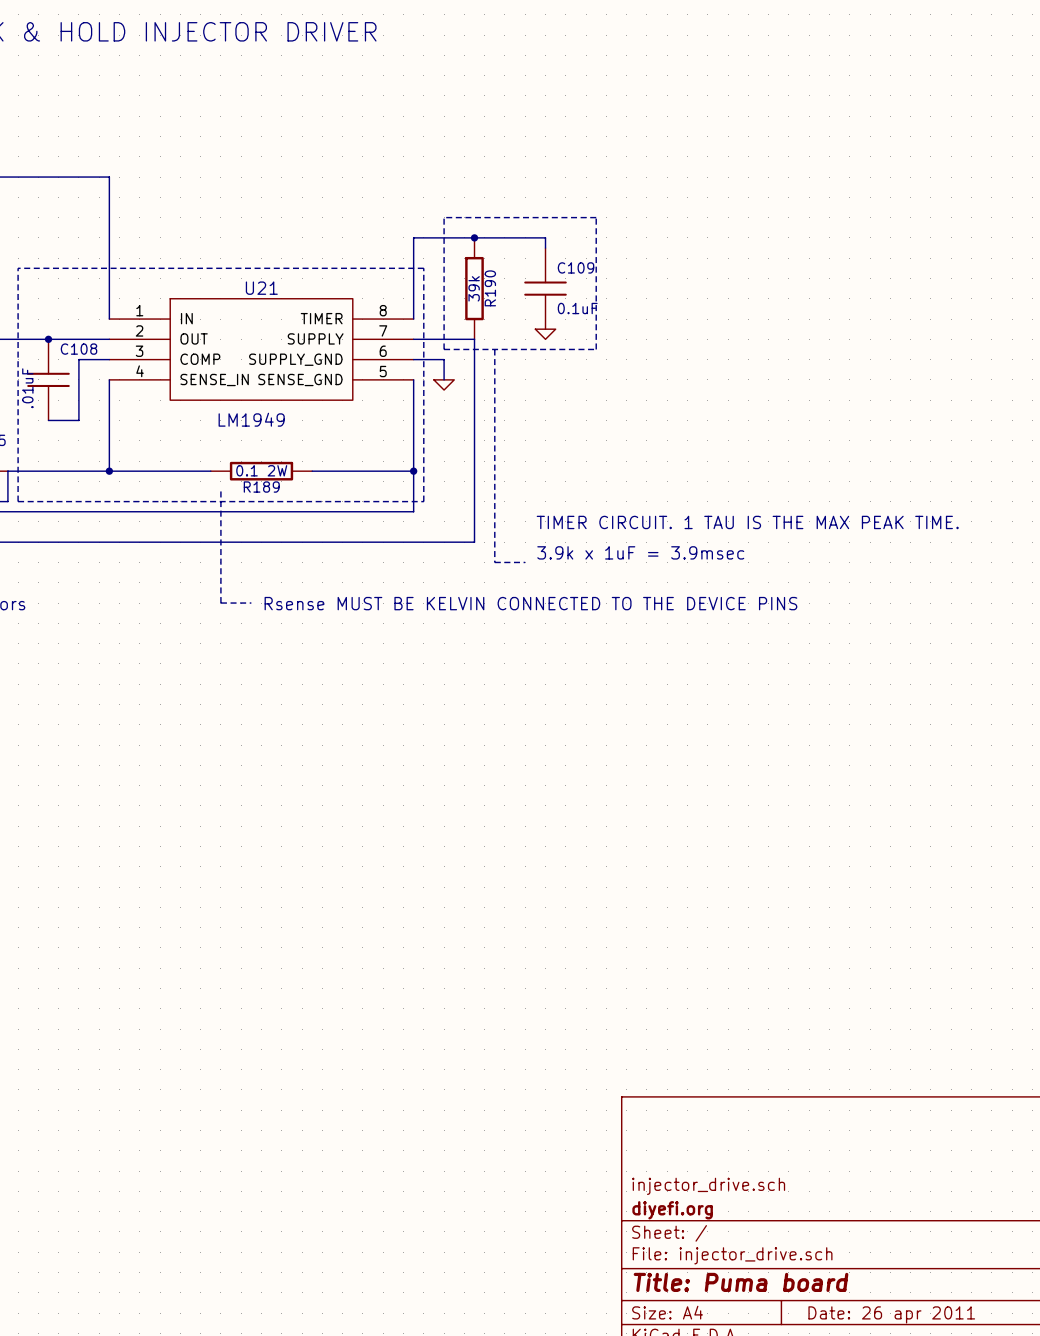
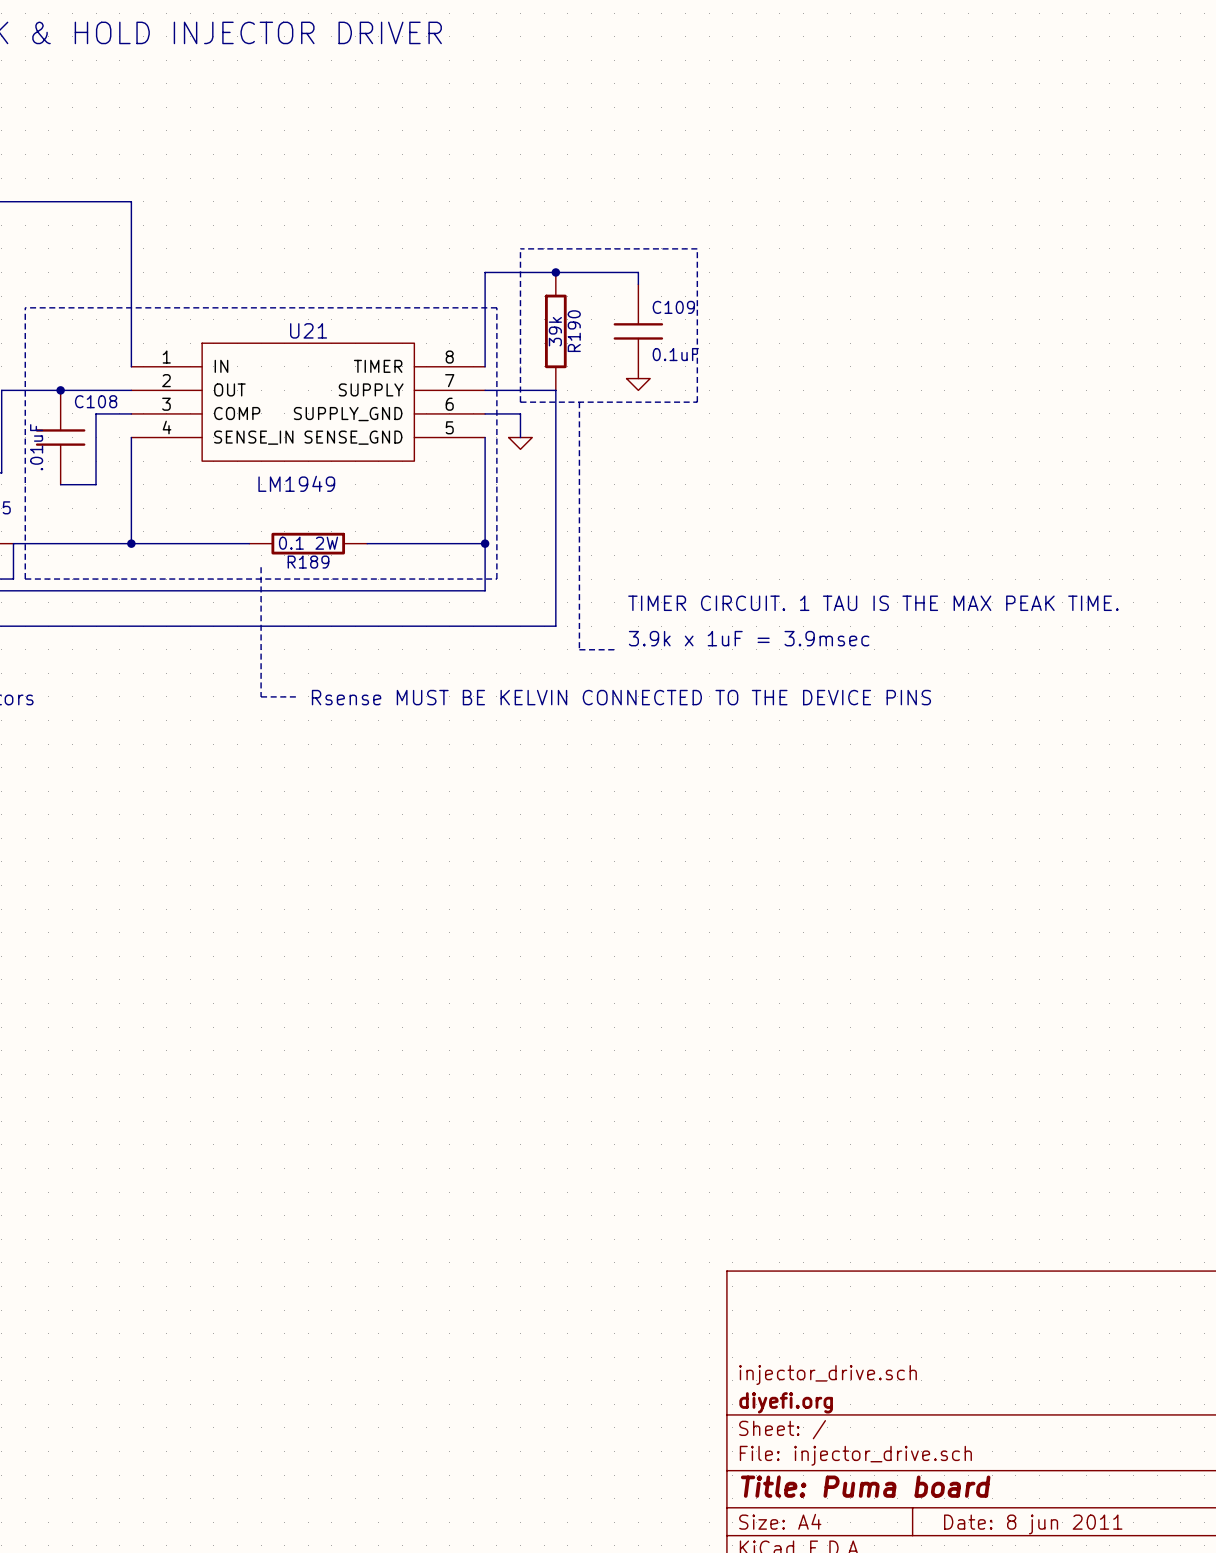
title block: Date: 26 apr 2011 (891, 1314) -> Date: 8 jun 2011 (1033, 1524)

